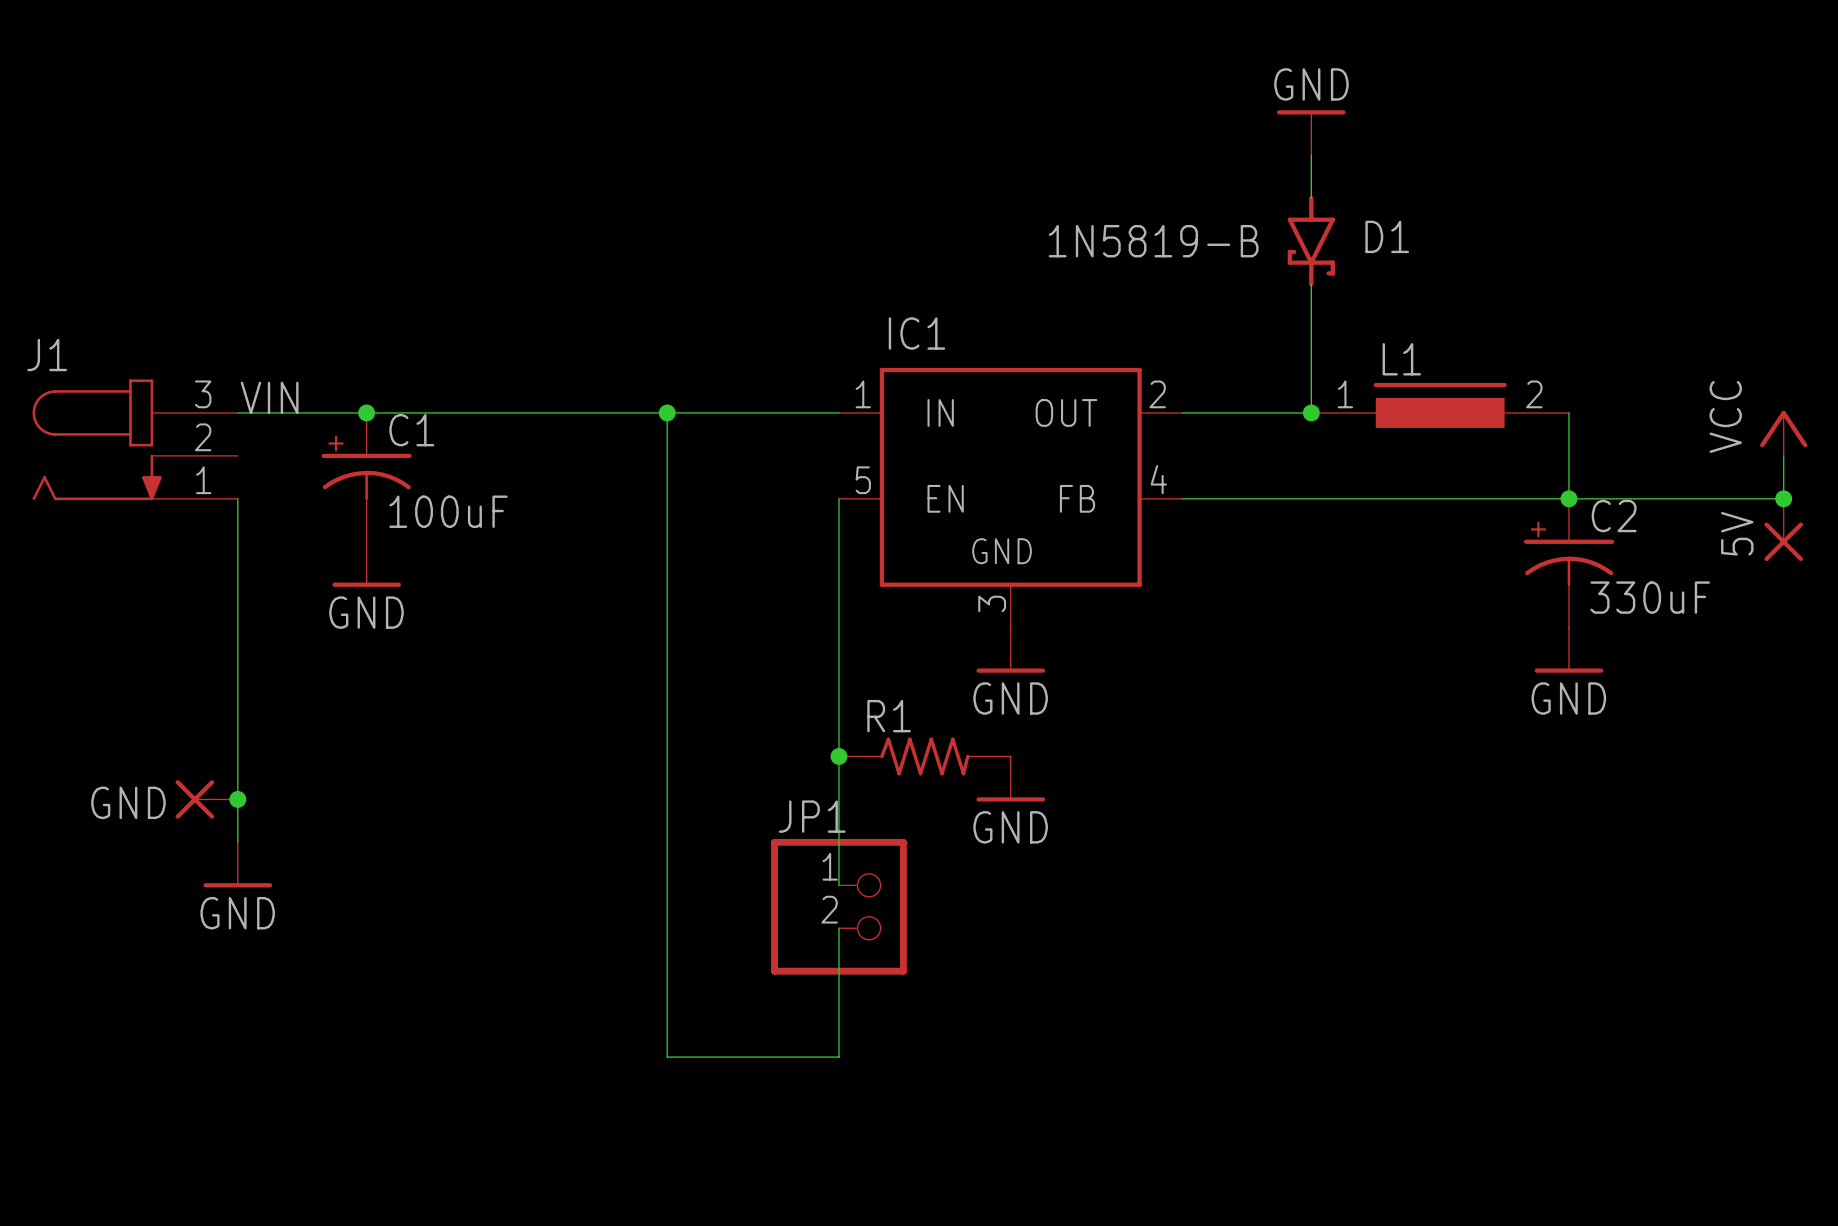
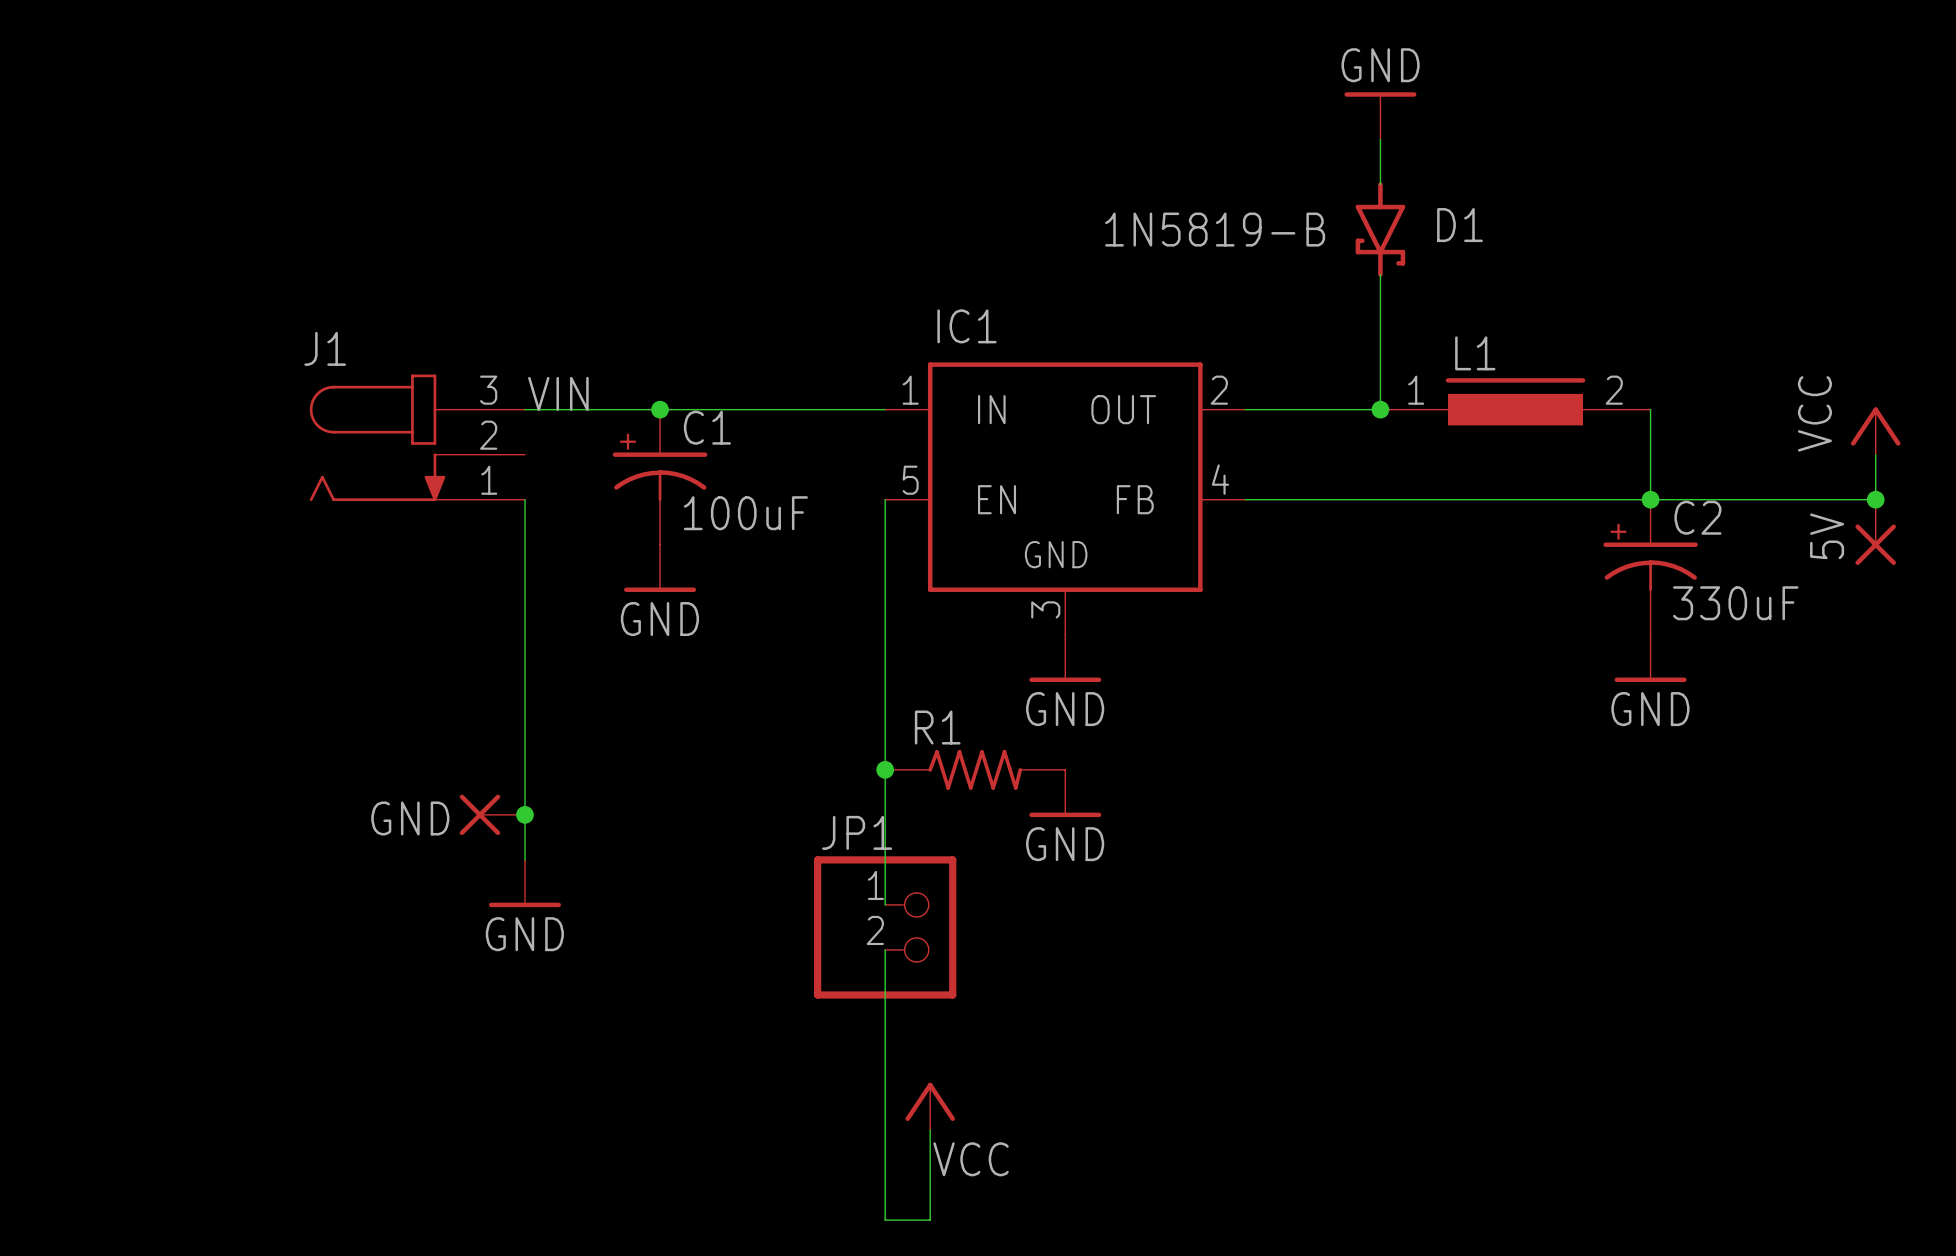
label position: VIN (269, 397) -> VIN (558, 393)
wire: (237, 412) (495, 412) -> none
junction: (366, 412) -> none
wire: (667, 412) (667, 1057) (838, 1057) -> (930, 1130) (930, 1220) (885, 1220) (885, 1085)
junction position: (667, 412) -> (660, 409)
J1 position: (135, 439) -> (417, 437)
C1 position: (366, 477) -> (660, 477)
wire: (237, 498) (237, 842) -> (524, 499) (524, 859)
power symbol: GND (366, 564) -> none
power symbol: none -> GND (660, 568)
GND position: (206, 799) -> (492, 814)
junction: (237, 799) -> none
junction: none -> (524, 814)
power symbol: GND (237, 864) -> none
power symbol: none -> GND (524, 883)
power symbol: none -> VCC (930, 1106)

